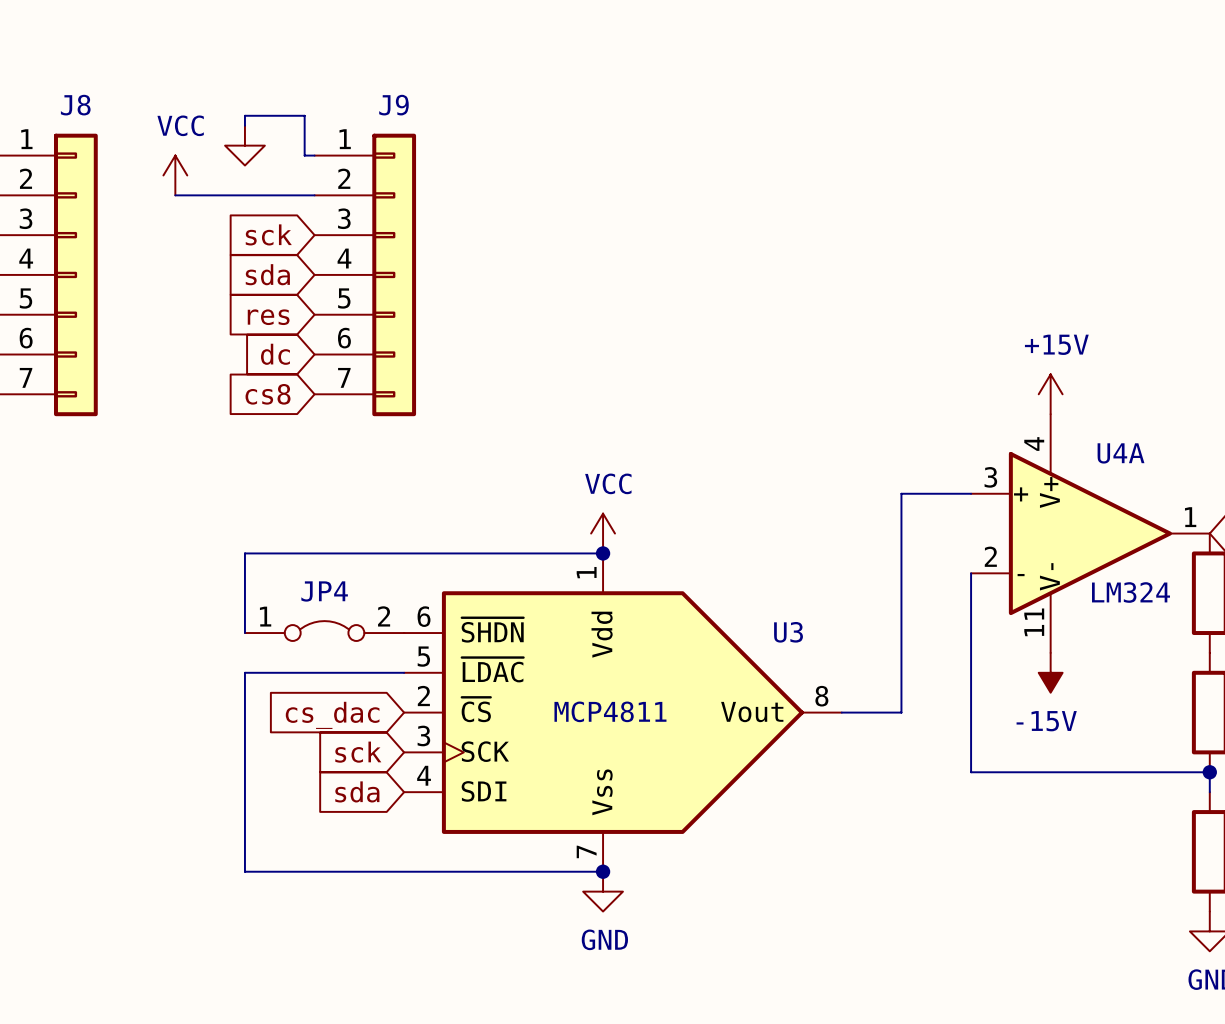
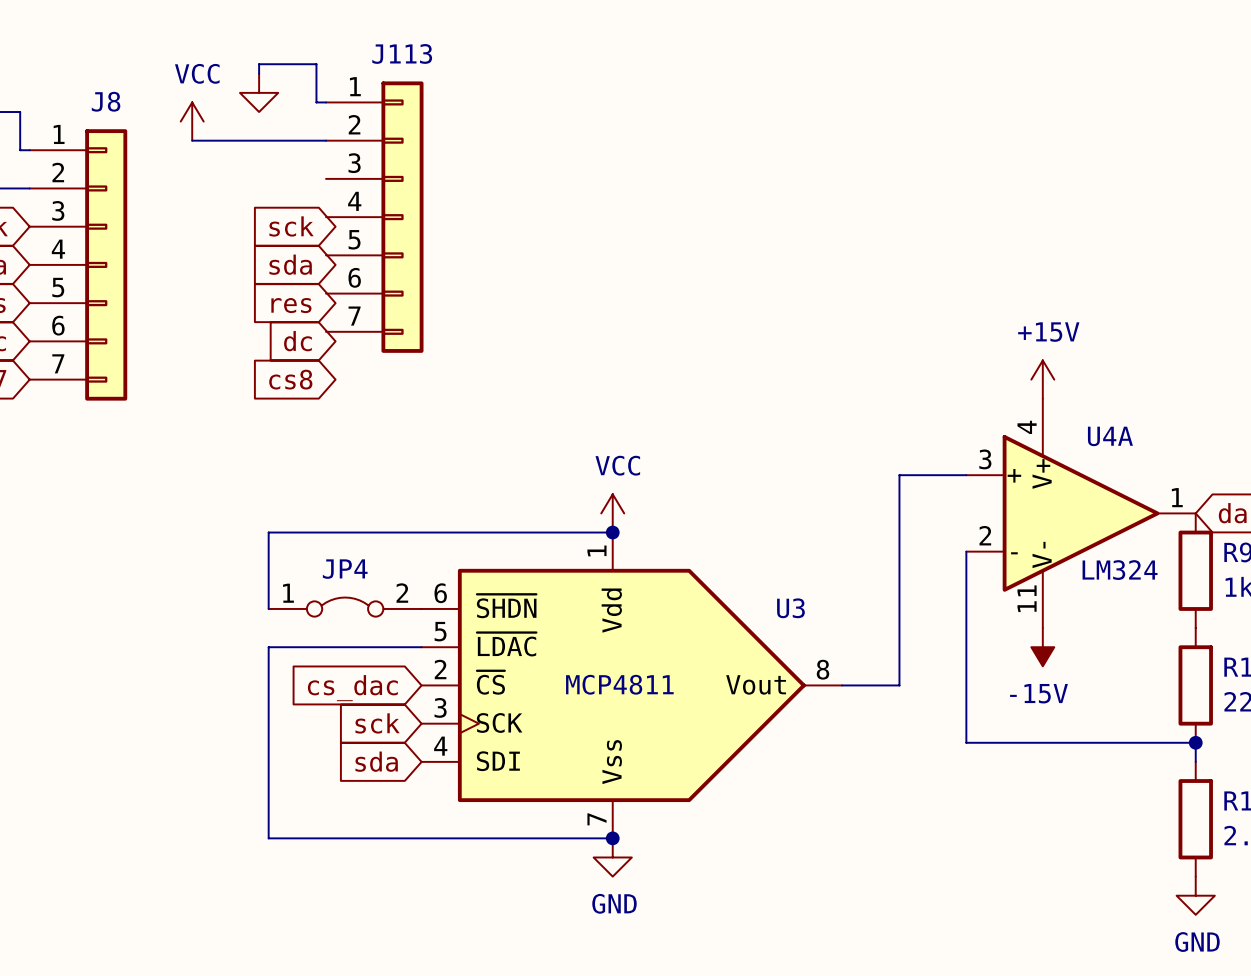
wire: (244, 125) (244, 115) (304, 115) (304, 155) (314, 155) -> (259, 73) (259, 64) (316, 64) (316, 102) (326, 102)
power symbol position: (244, 145) -> (259, 92)
power symbol position: VCC (175, 175) -> VCC (192, 121)
wire: (175, 195) (314, 195) -> (192, 140) (326, 140)
J113: none -> (374, 217)
J9: (365, 274) -> none

